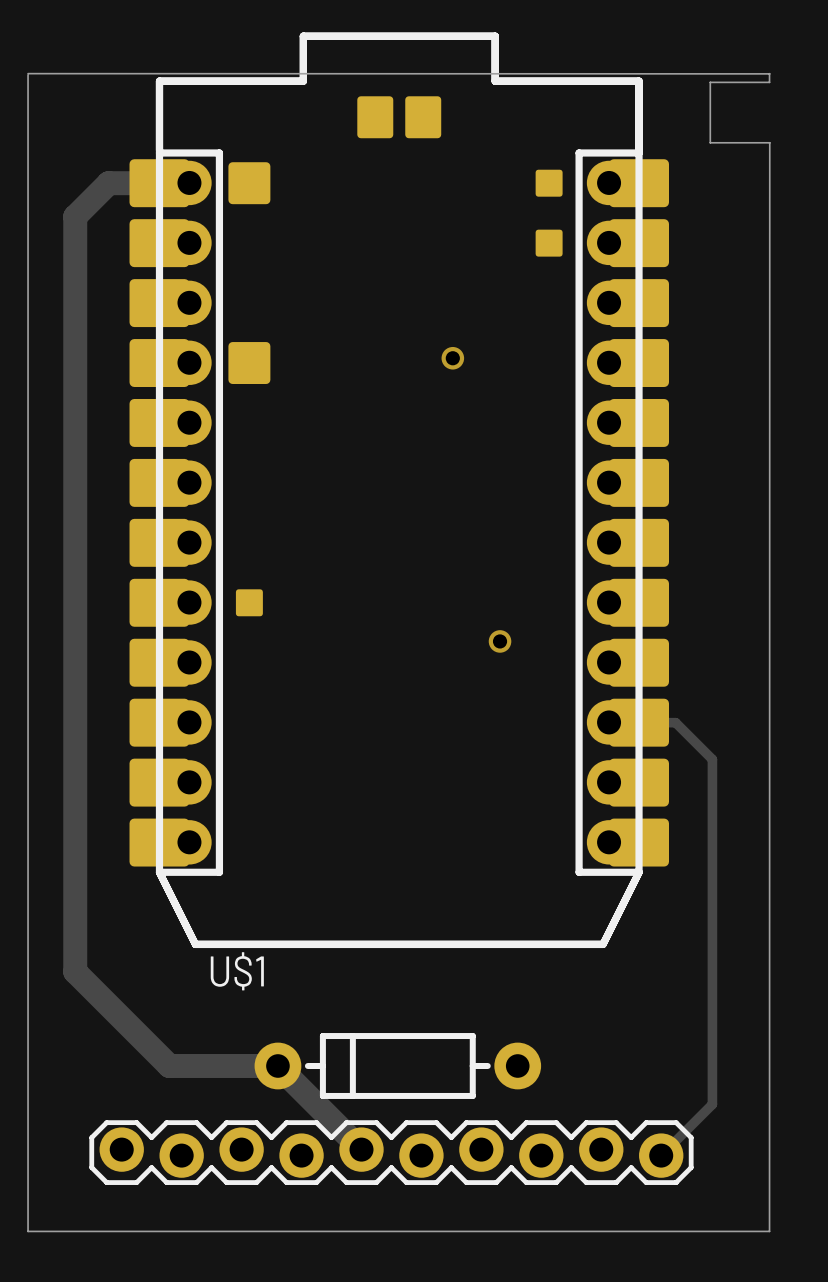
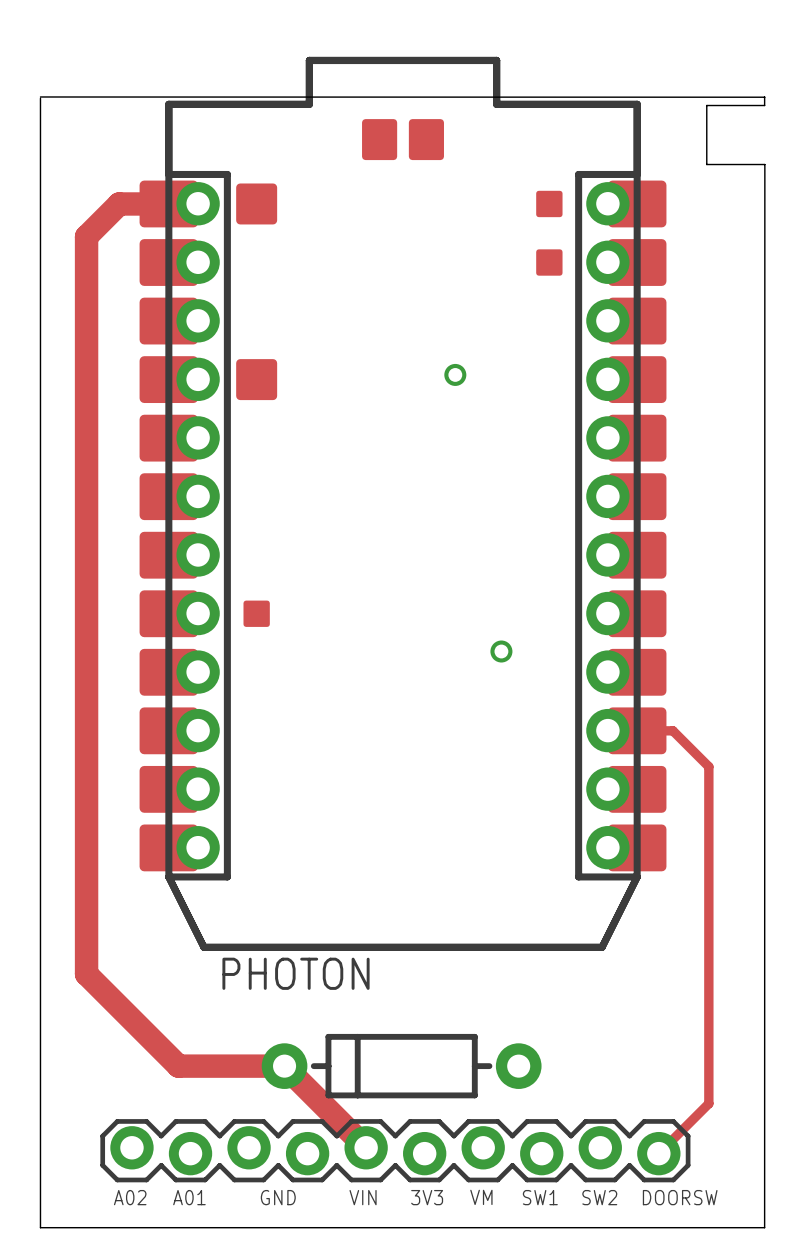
U$1 name: U$1 (237, 971) -> PHOTON (296, 973)
text: none -> A02 (130, 1197)
text: none -> A01 (189, 1197)
text: none -> GND (278, 1197)
text: none -> VIN (363, 1197)
text: none -> 3V3 (427, 1197)
text: none -> VM (481, 1197)
text: none -> SW1 (540, 1197)
text: none -> SW2 (599, 1197)
text: none -> DOORSW (680, 1197)

